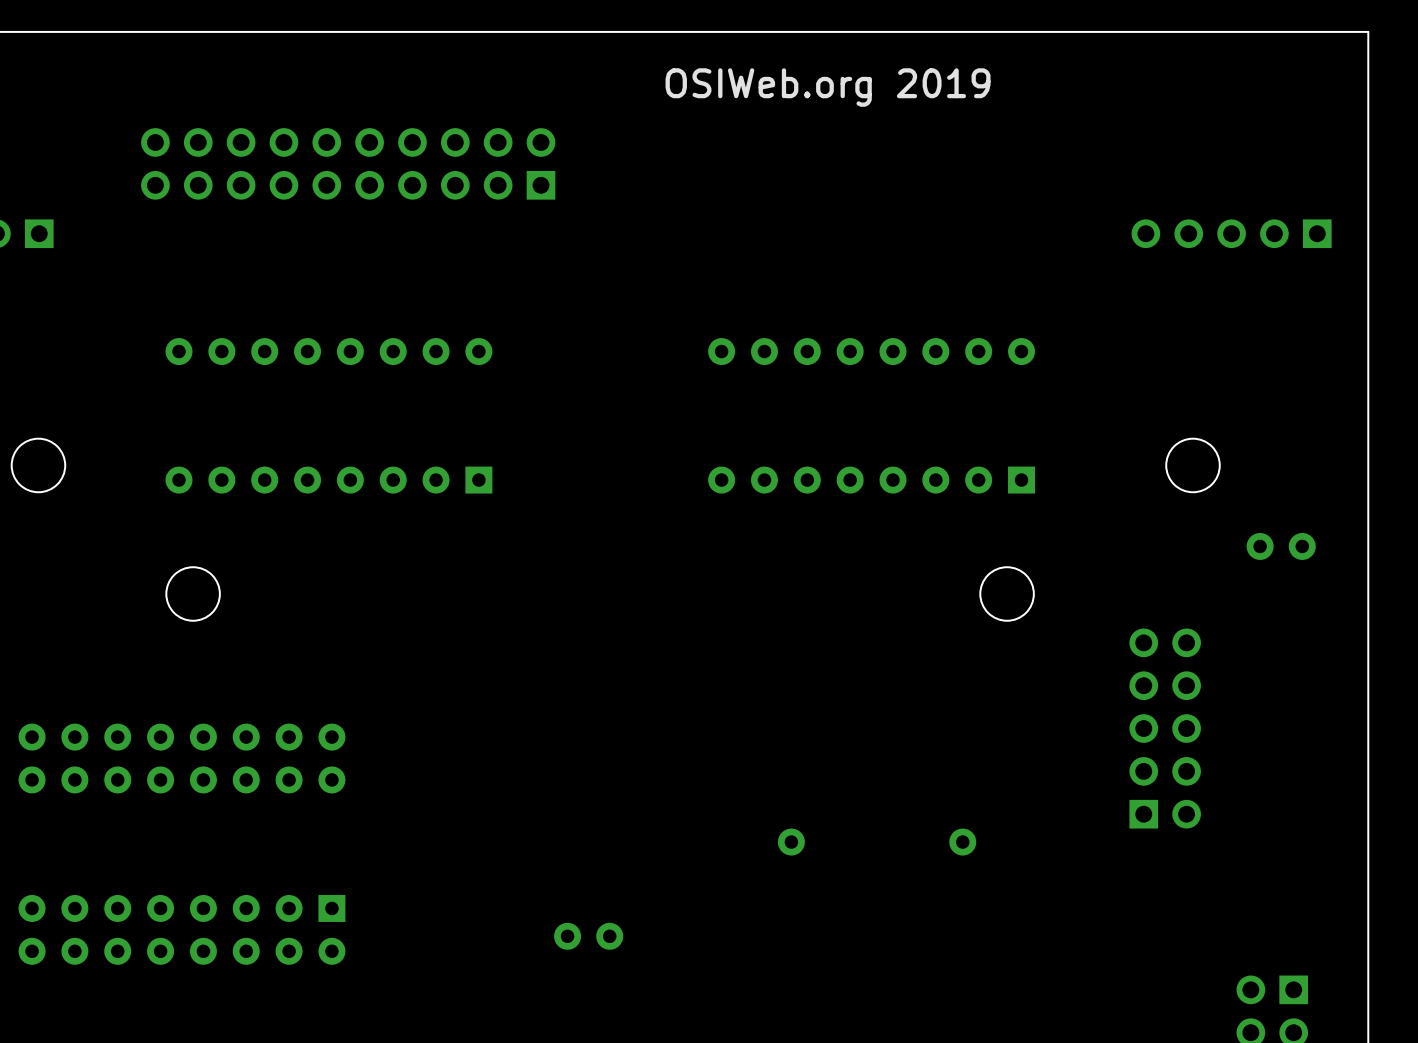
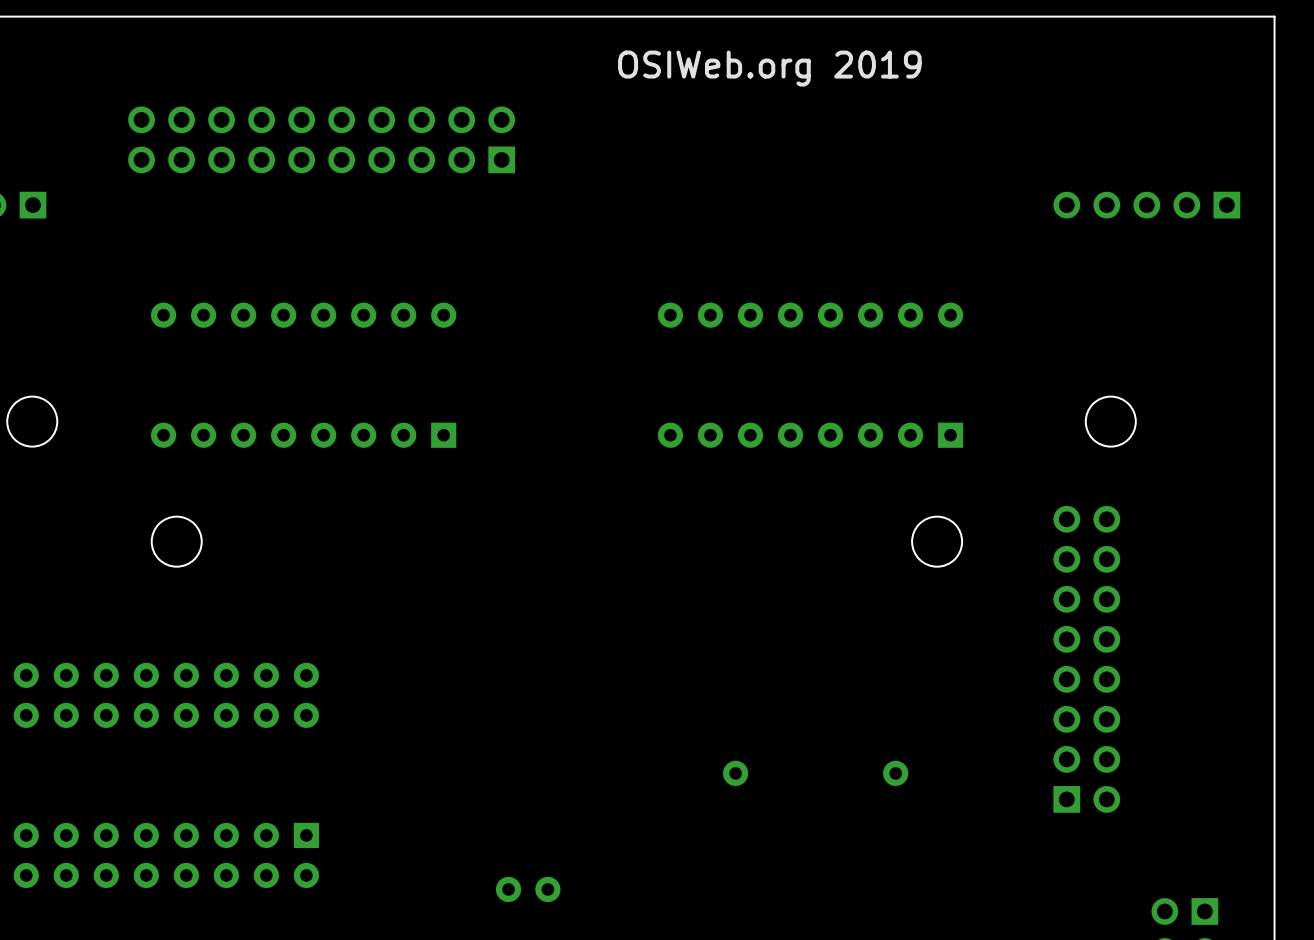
part: (1281, 546) -> none
part footprint: [1129, 628, 1201, 829] -> [1053, 505, 1121, 813]
part position: (588, 936) -> (528, 889)

